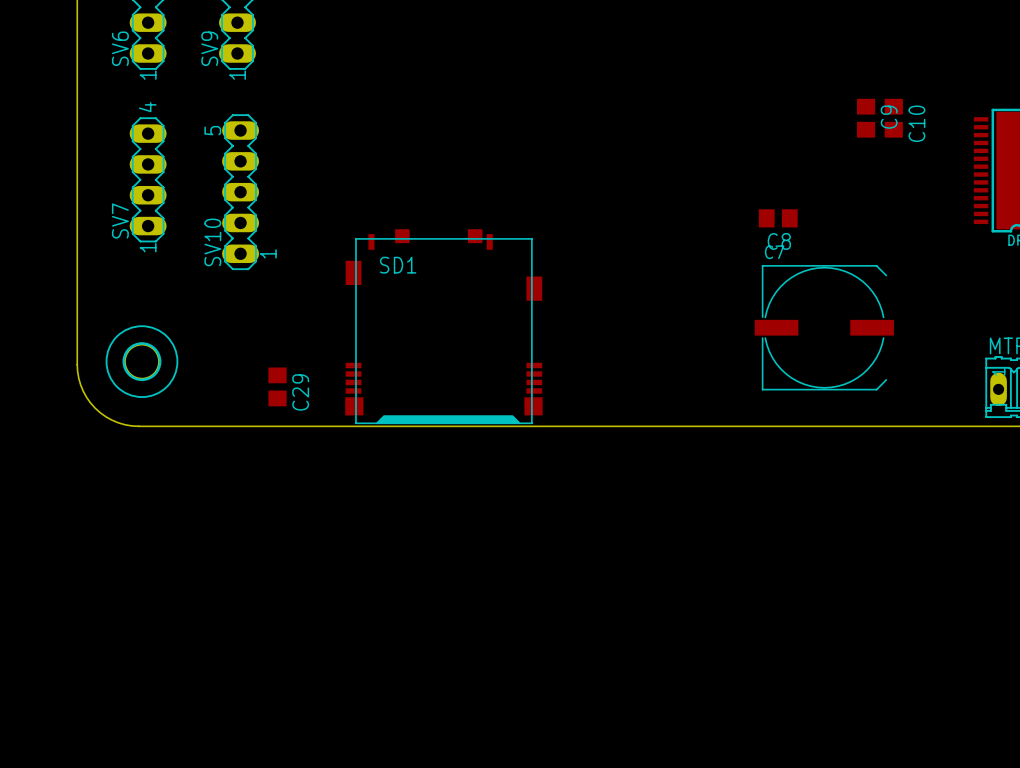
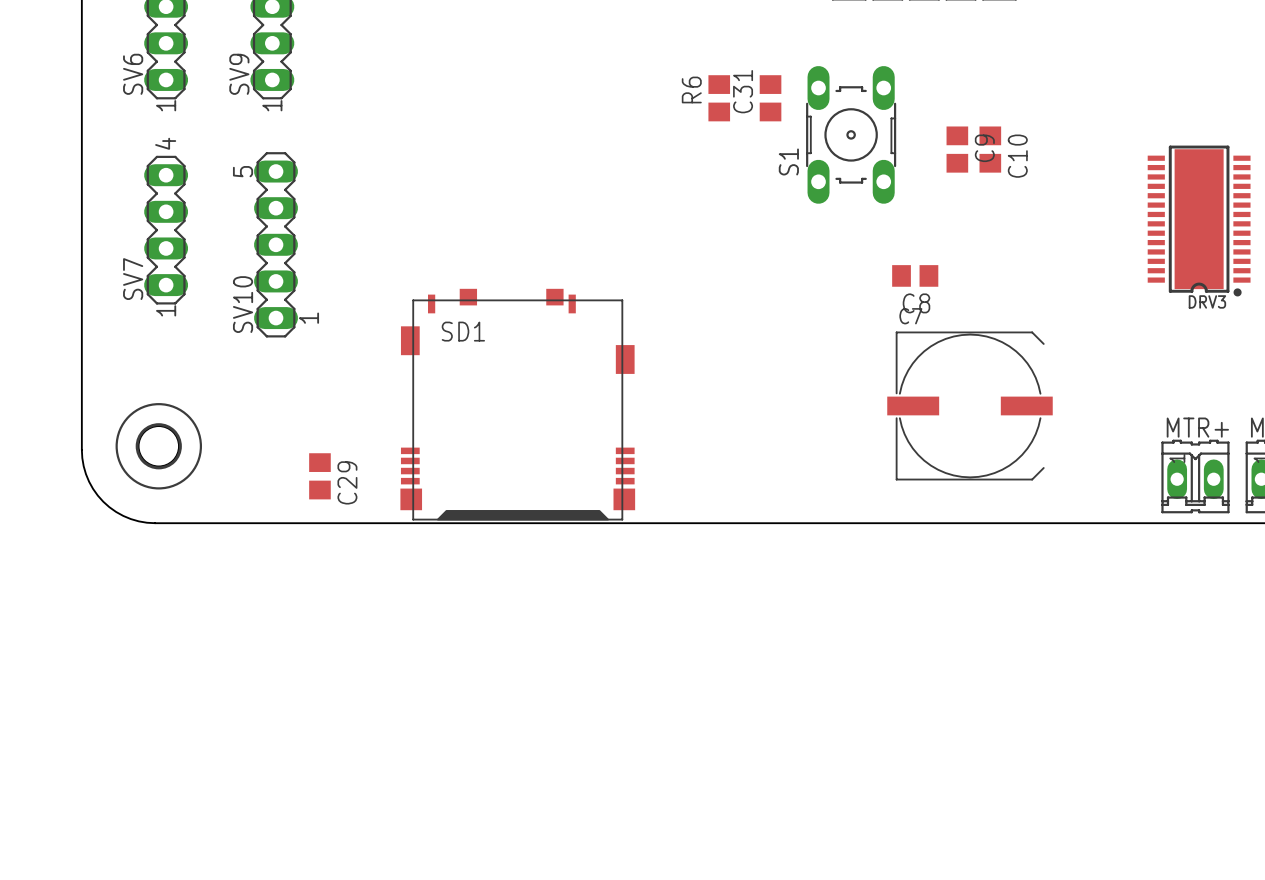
R6: none -> (719, 98)
C31: none -> (770, 98)
S1: none -> (851, 134)
C9 position: (866, 118) -> (957, 149)
C10 position: (893, 118) -> (990, 149)

